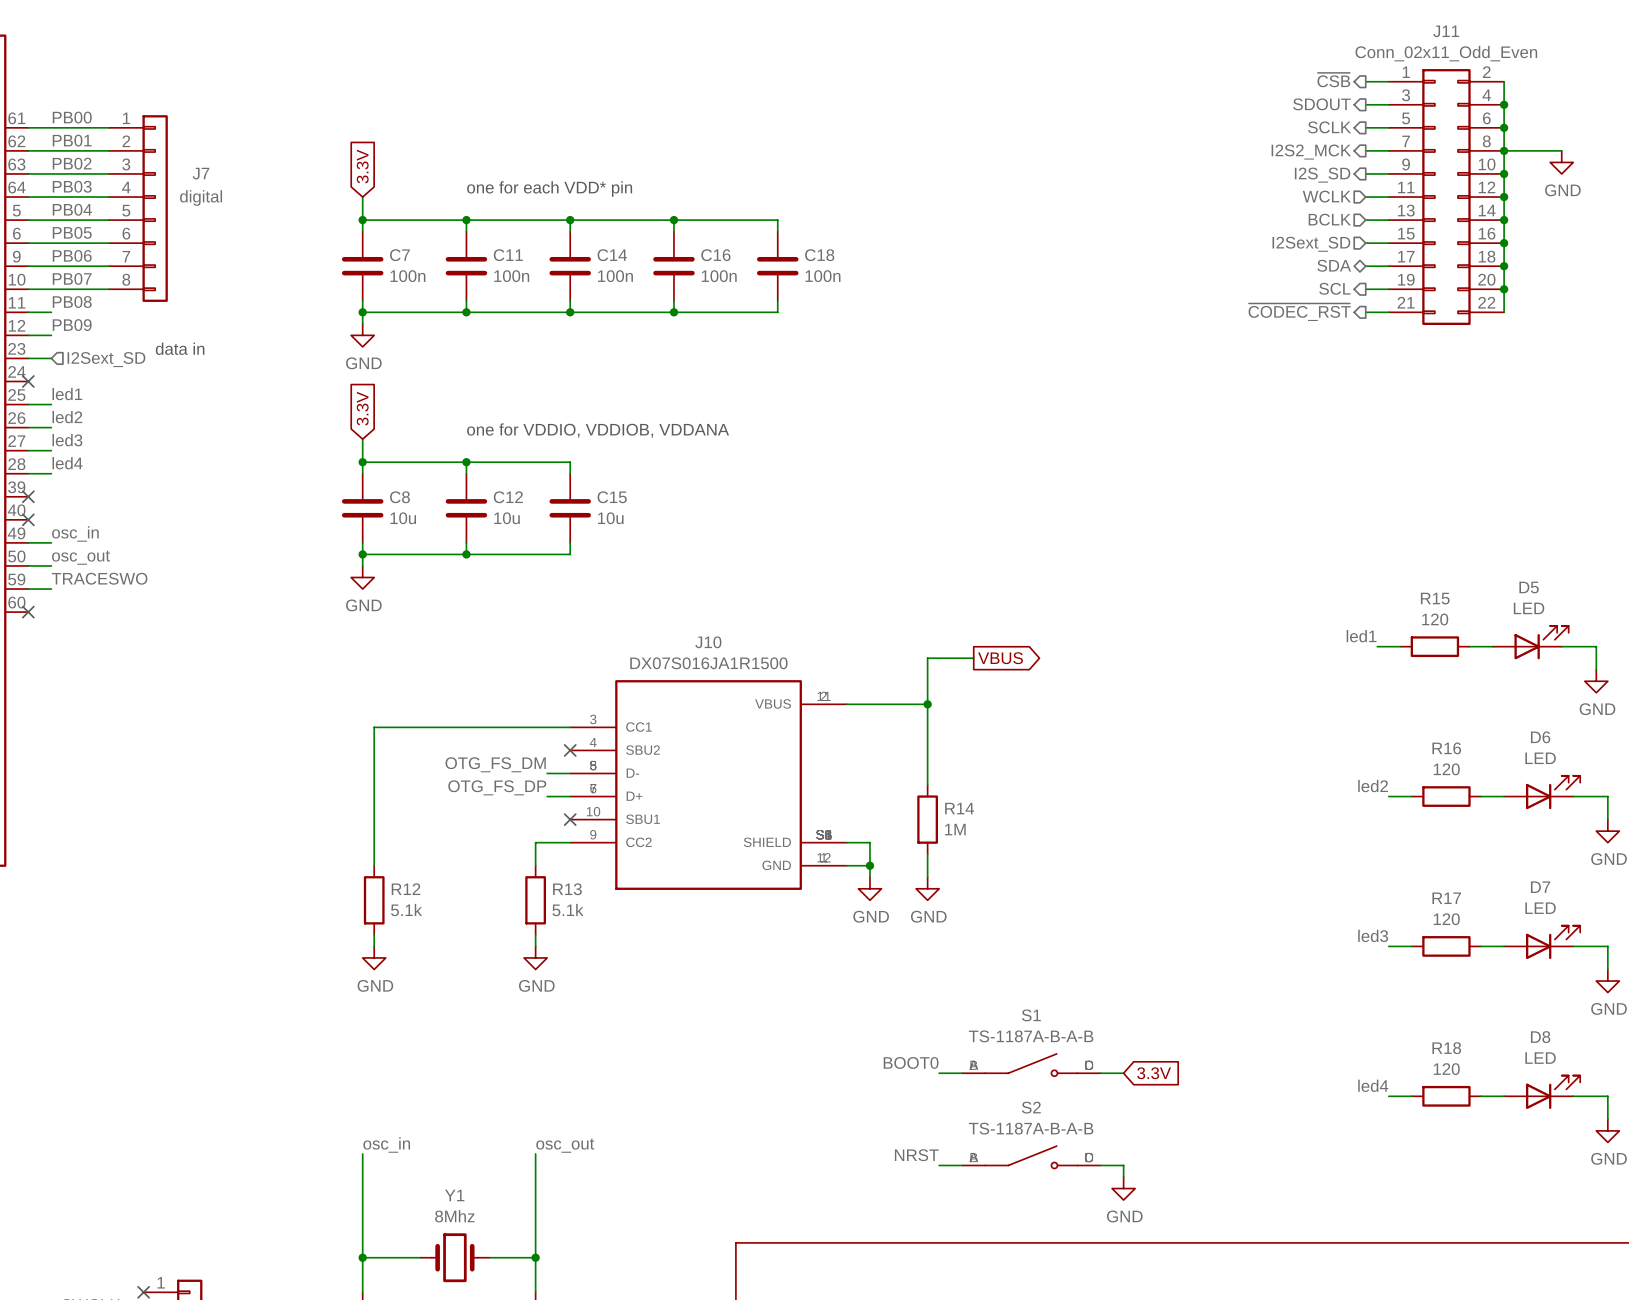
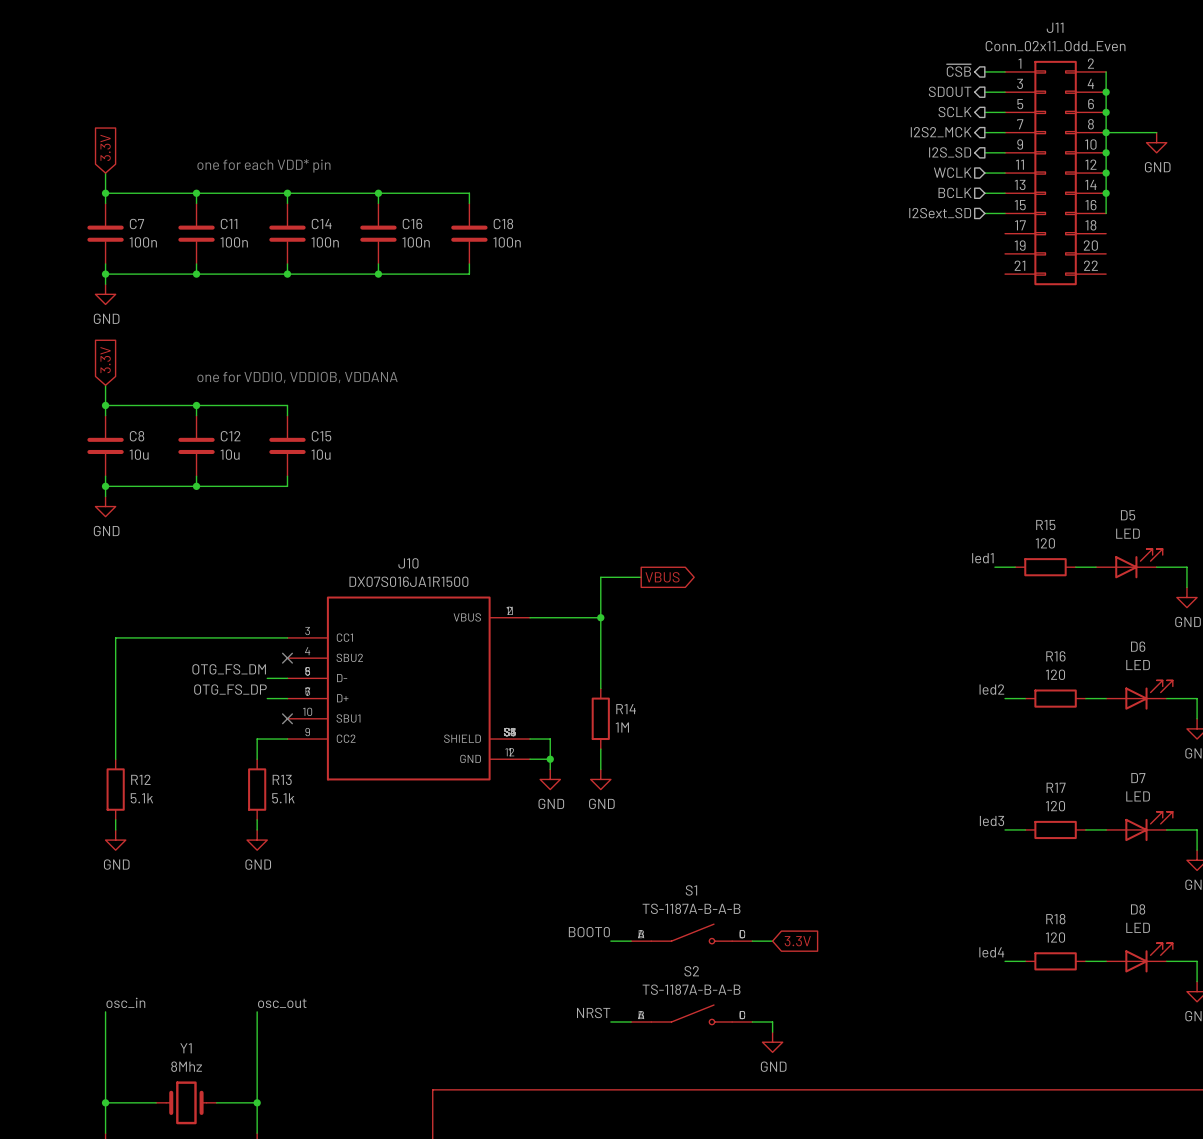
wire: (1504, 243) (1504, 312) -> none
junction: (1504, 243) -> none
hierarchical label: SDA (1334, 265) -> none
wire: (1365, 266) (1388, 266) -> none
junction: (1504, 266) -> none
hierarchical label: SCL (1334, 288) -> none
wire: (1365, 289) (1388, 289) -> none
junction: (1504, 289) -> none
hierarchical label: ~{CODEC_RST} (1299, 312) -> none
wire: (1365, 312) (1388, 312) -> none

